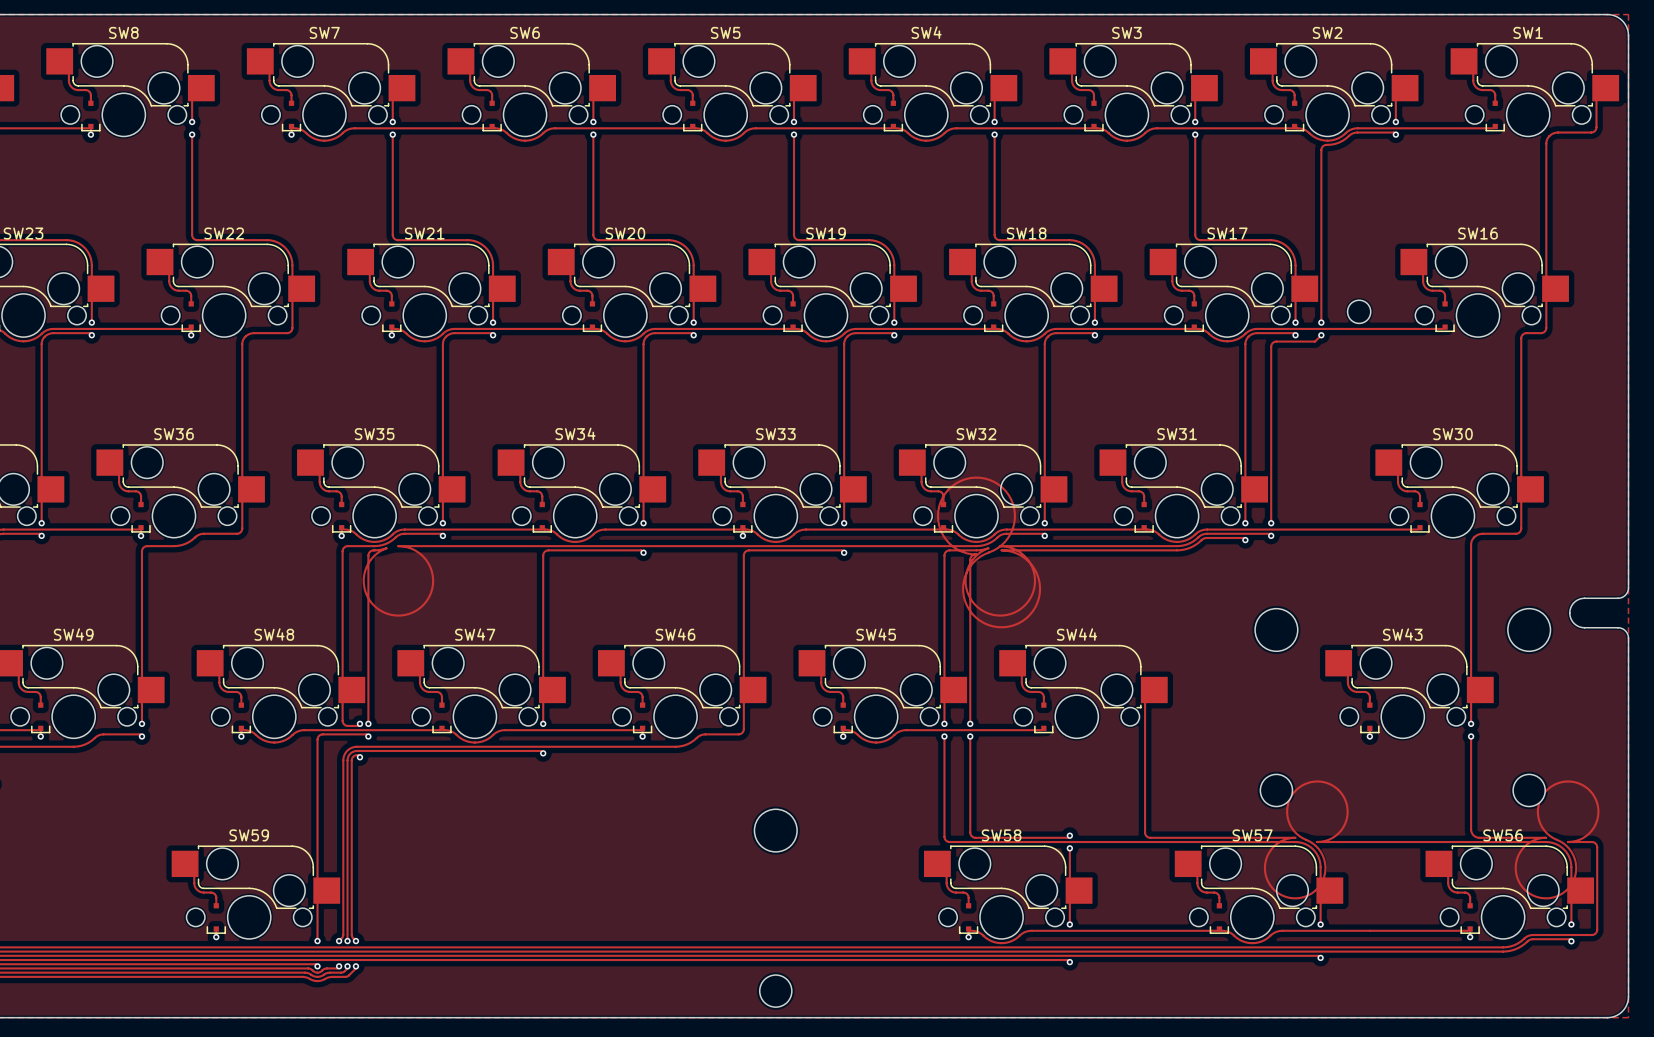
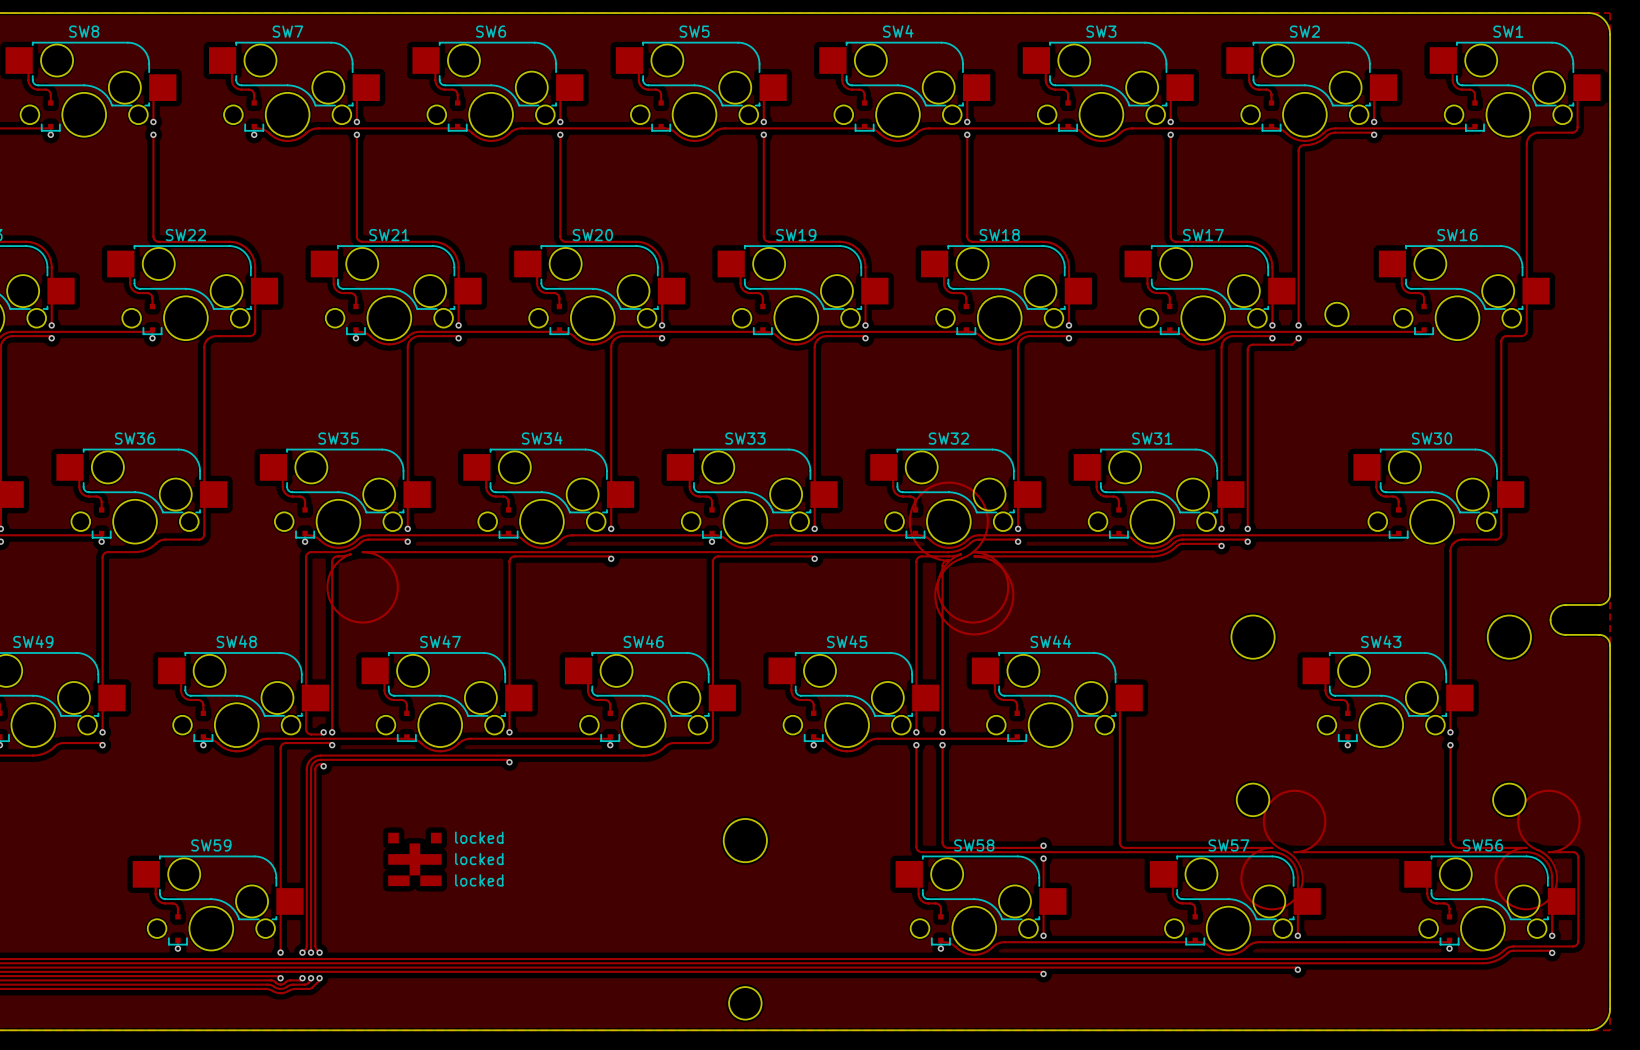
drawing: none -> [388, 832, 442, 887]
text: none -> locked (479, 837)
text: none -> locked (479, 859)
text: none -> locked (479, 880)

